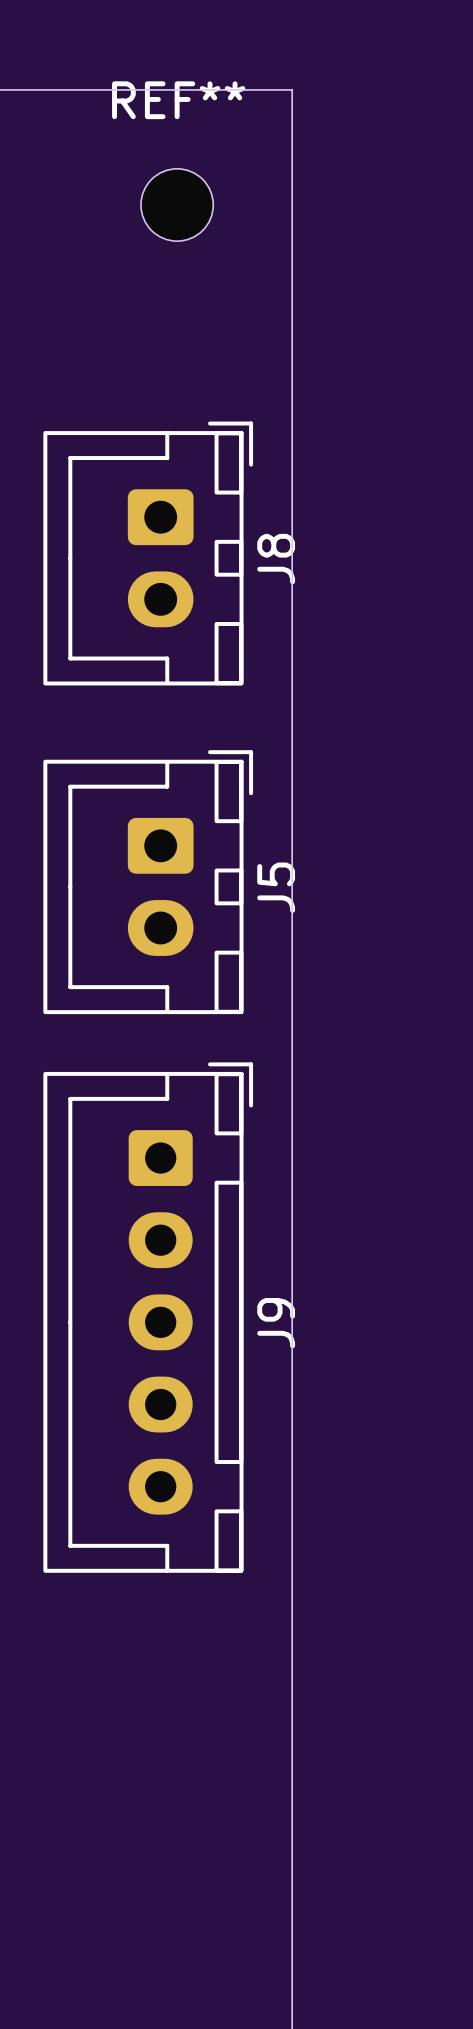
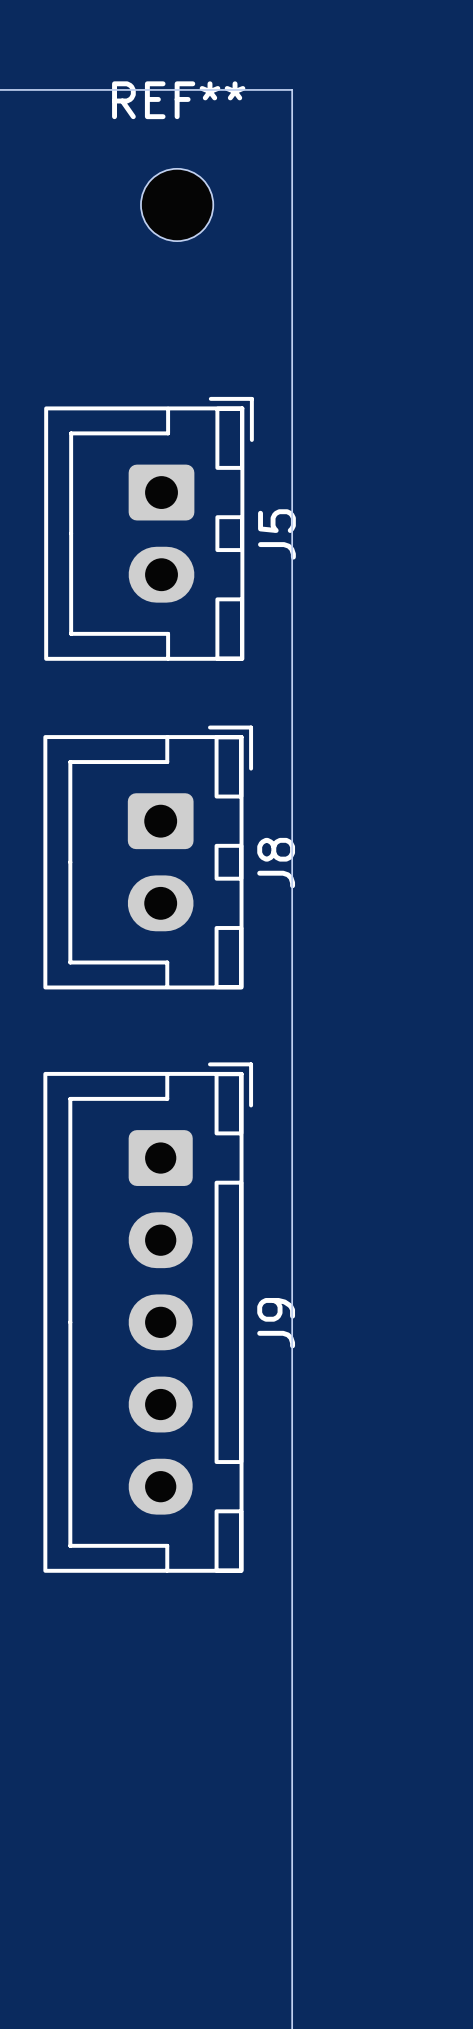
J8 position: (148, 553) -> (148, 857)
J5 position: (148, 882) -> (149, 528)

